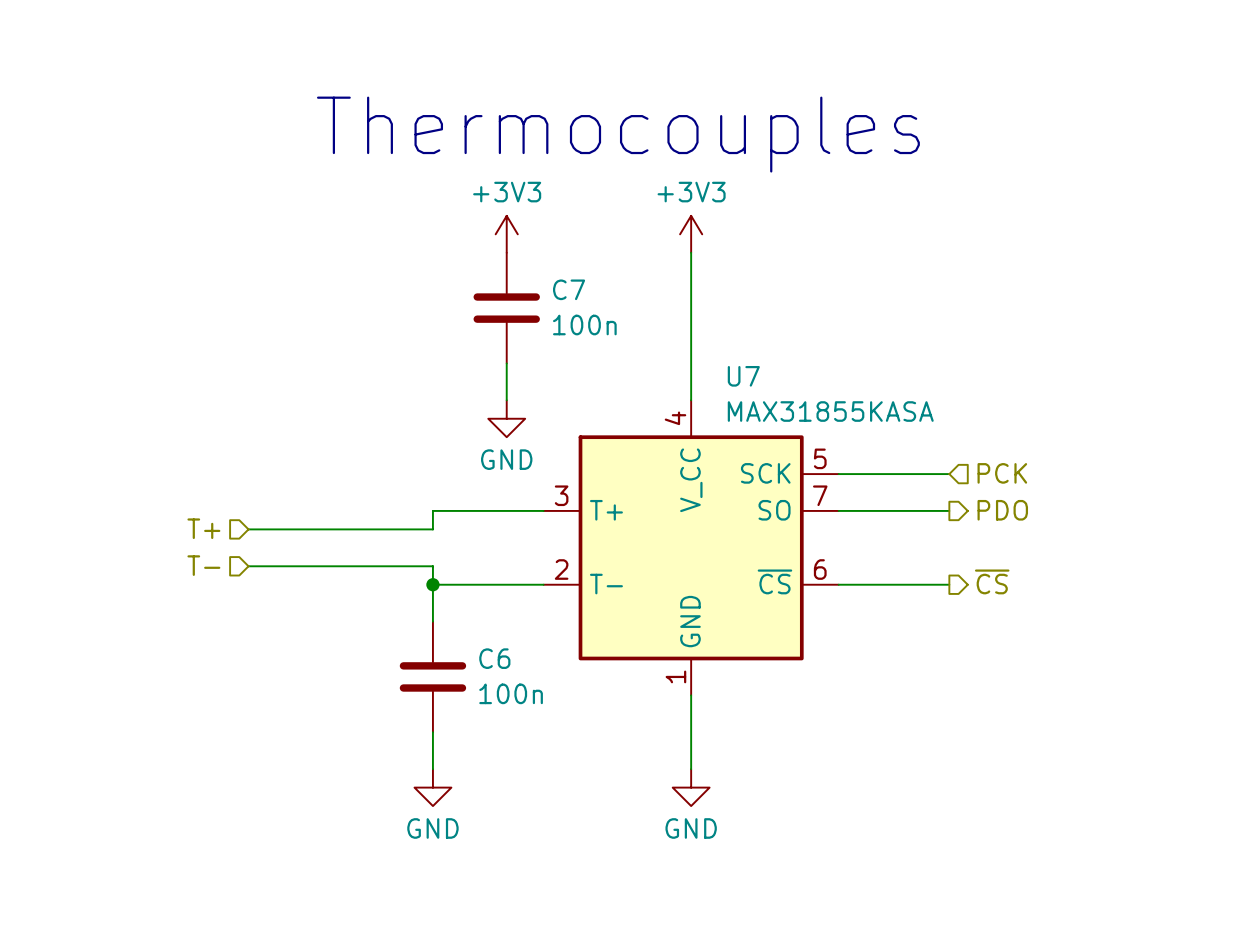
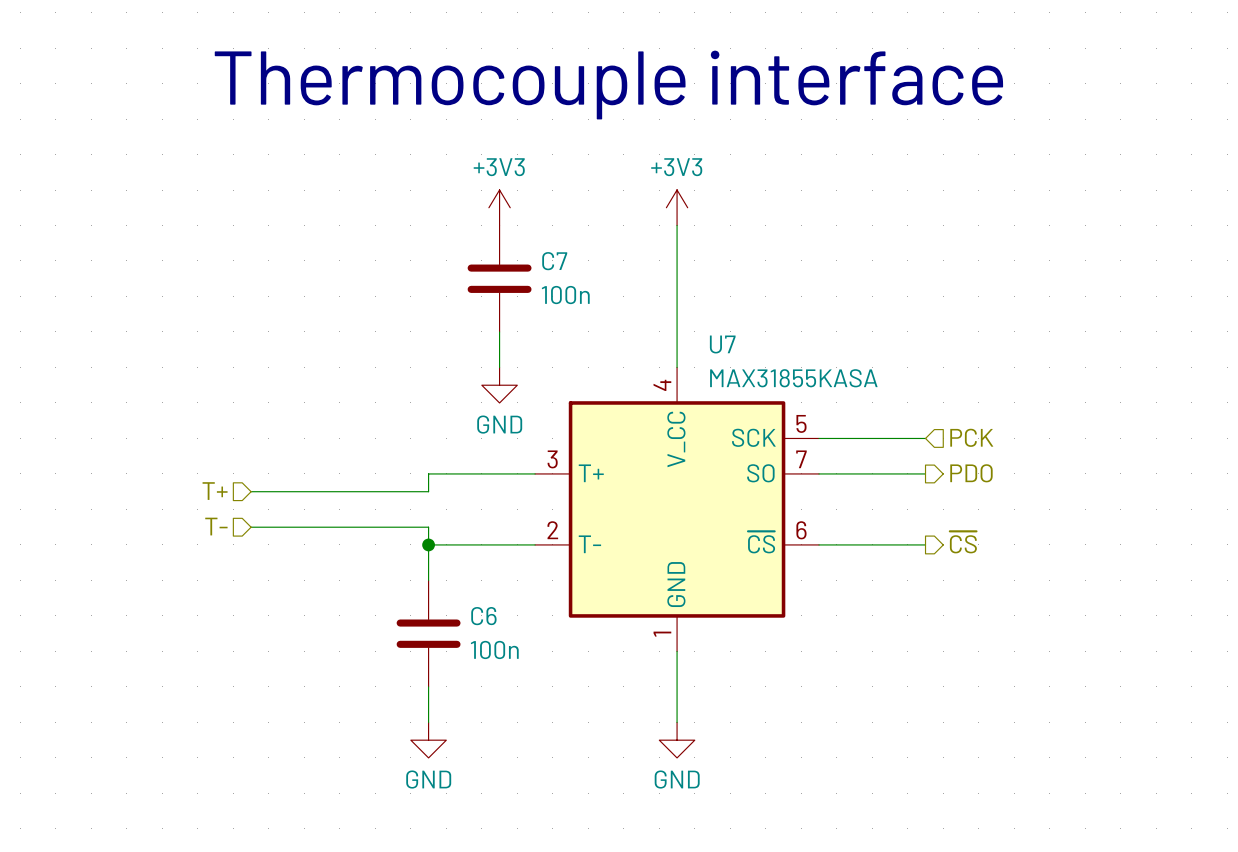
text: Thermocouples (618, 134) -> Thermocouple interface (608, 85)

